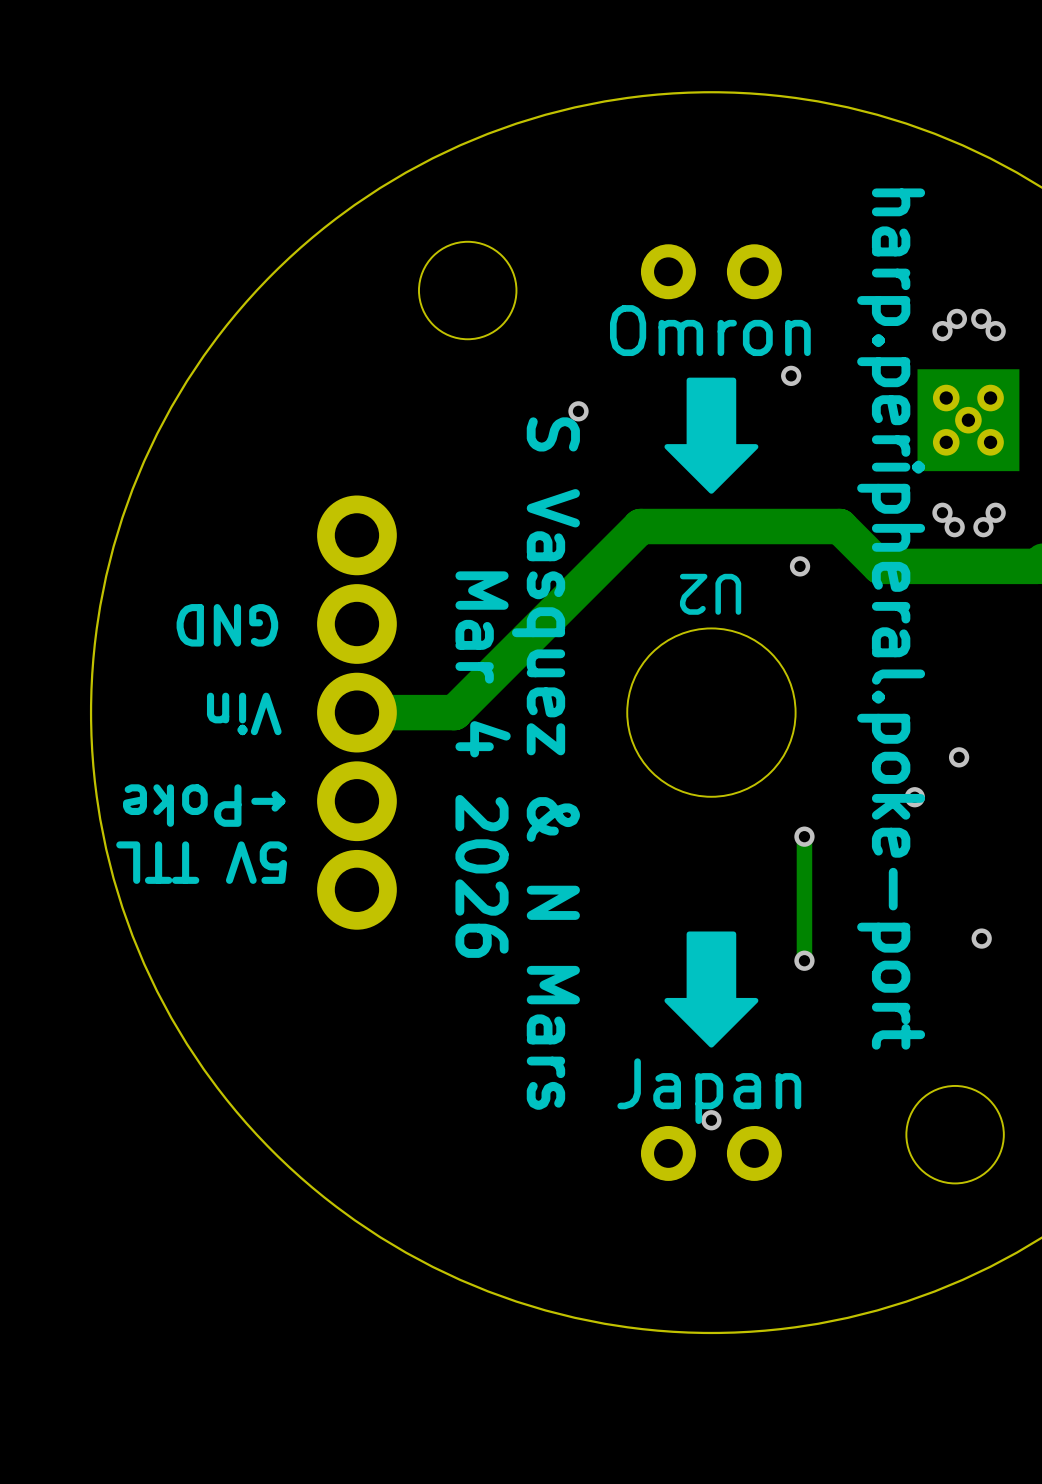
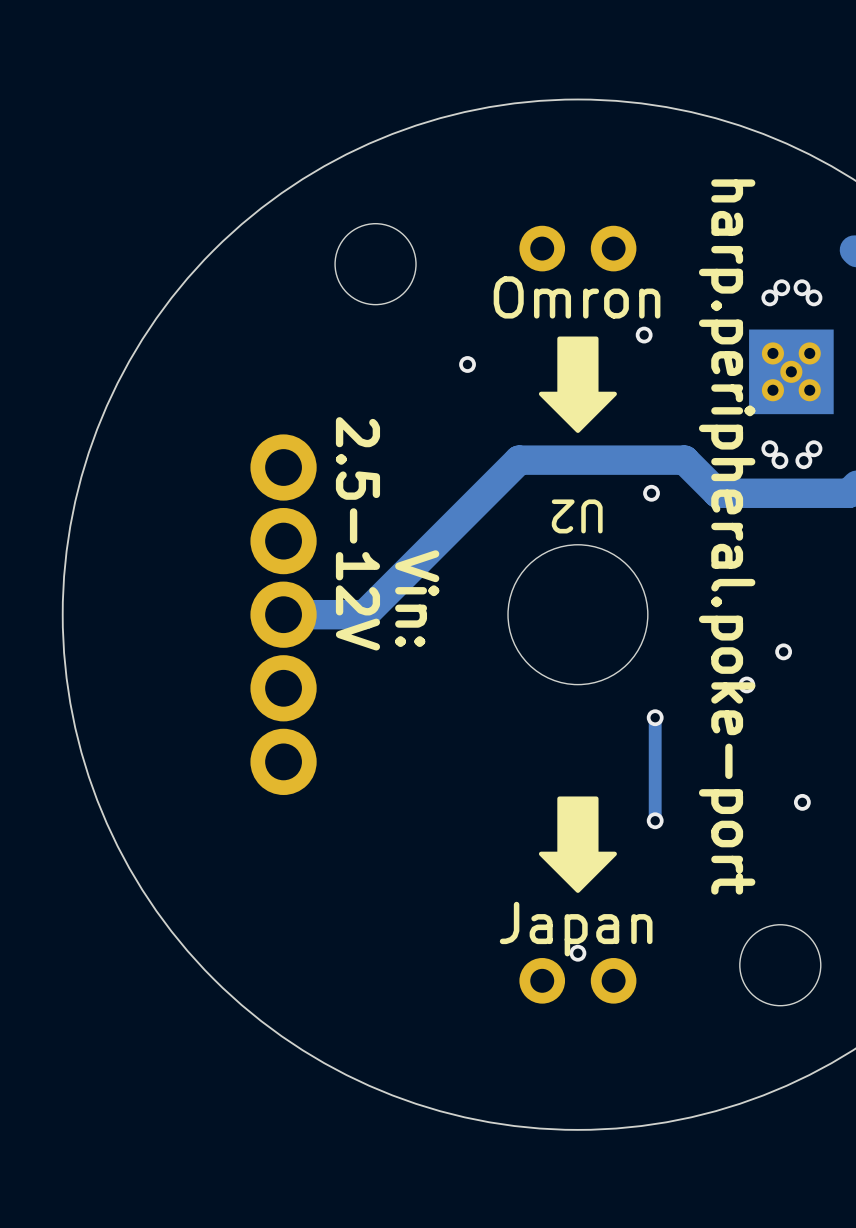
text: none -> 2.5-12V (357, 533)
text: GND (227, 625) -> none
text: none -> Vin: (417, 598)
text: Vin (244, 713) -> none
text: S Vasquez & N Mars (545, 763) -> none
text: Mar 4 2026 (483, 764) -> none
text: ←Poke (204, 805) -> none
text: 5V TTL (201, 862) -> none

